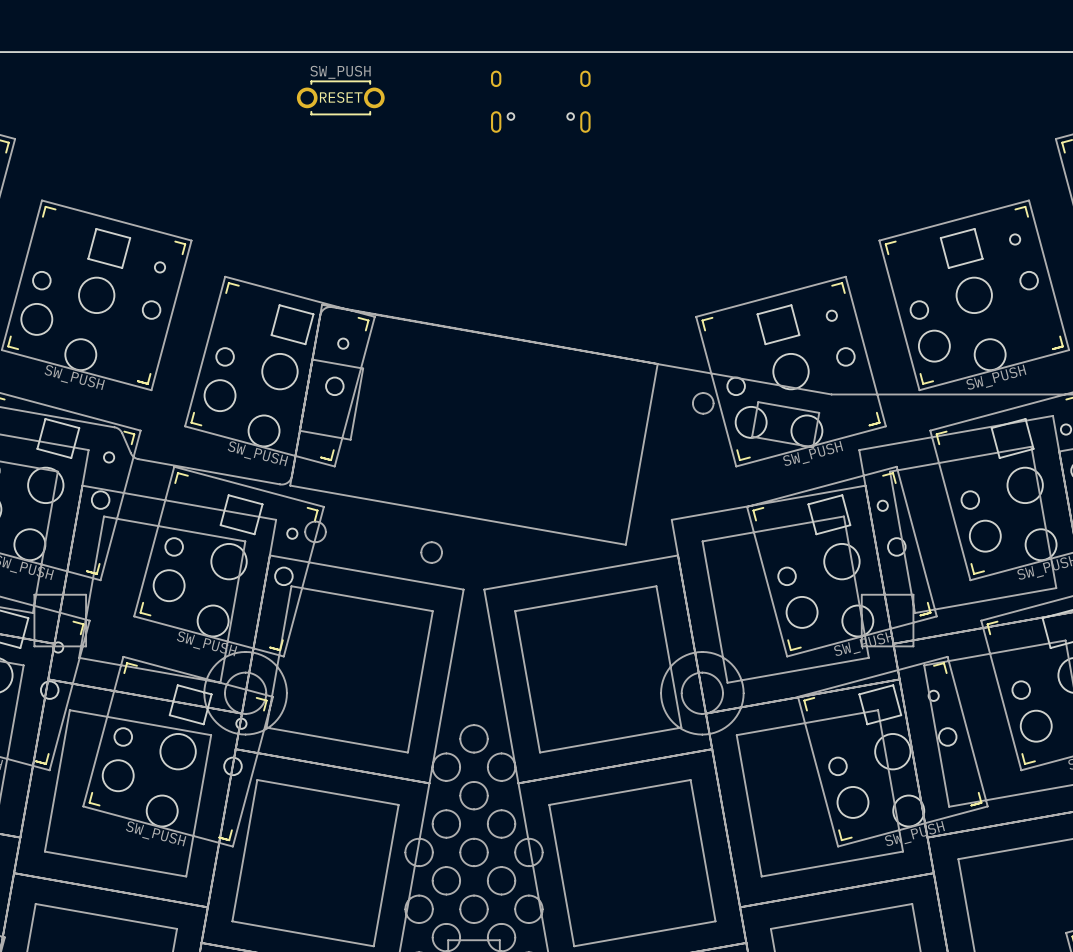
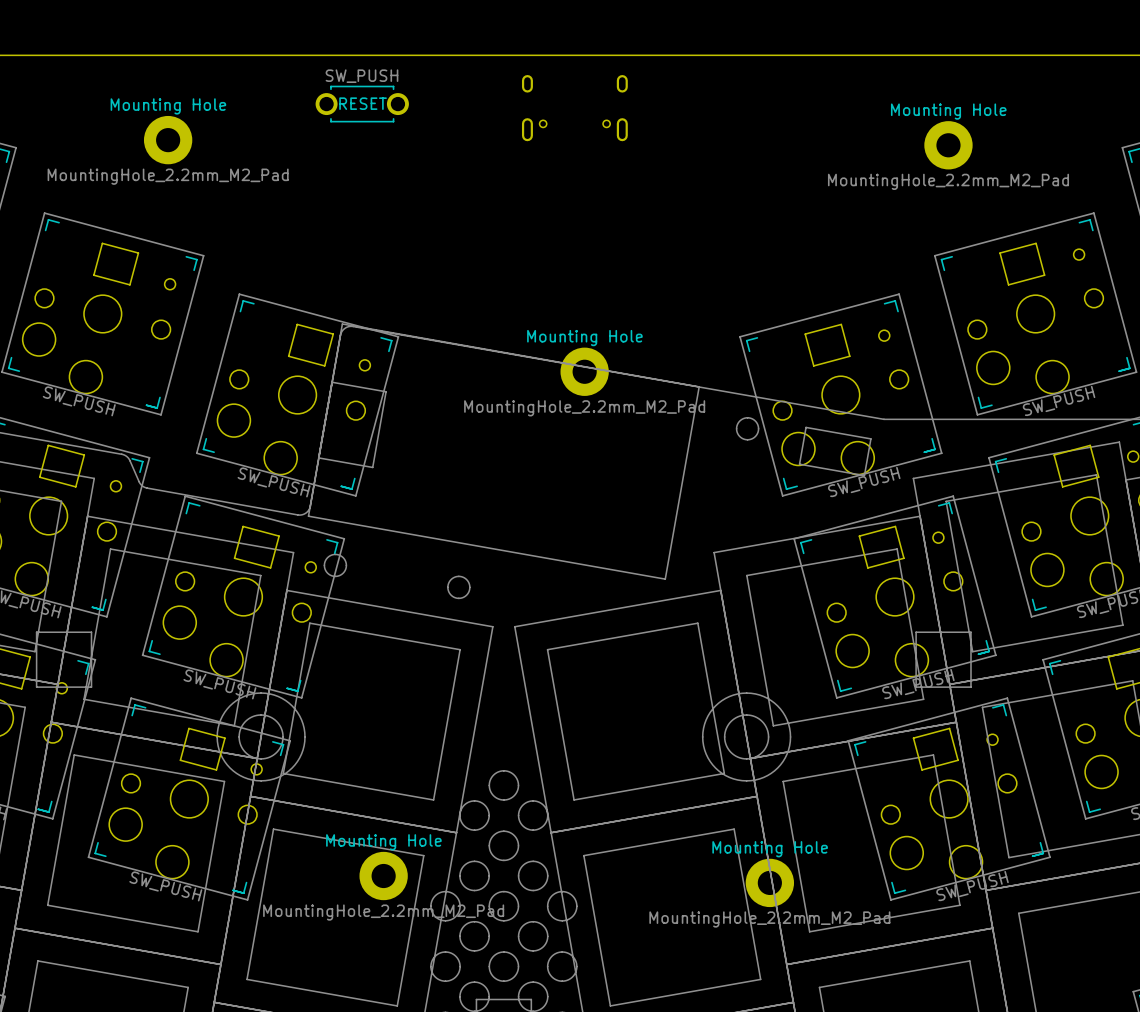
Mounting Hole: none -> MountingHole_2.2mm_M2_Pad (168, 140)
Mounting Hole: none -> MountingHole_2.2mm_M2_Pad (948, 145)
Mounting Hole: none -> MountingHole_2.2mm_M2_Pad (584, 371)
Mounting Hole: none -> MountingHole_2.2mm_M2_Pad (383, 876)
Mounting Hole: none -> MountingHole_2.2mm_M2_Pad (769, 882)

